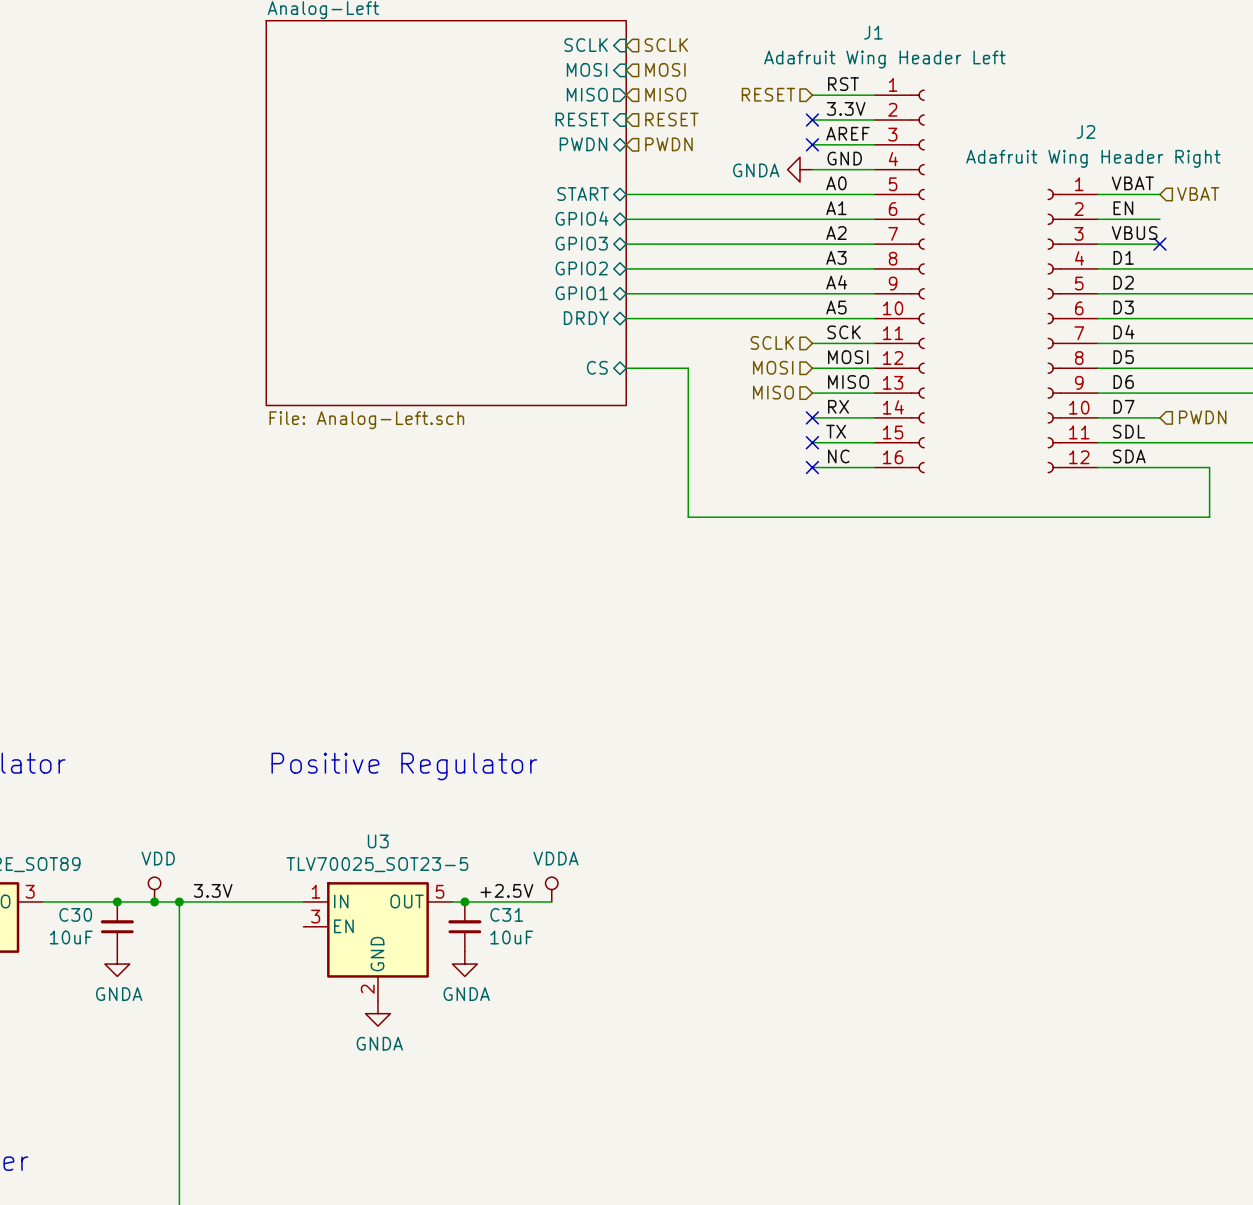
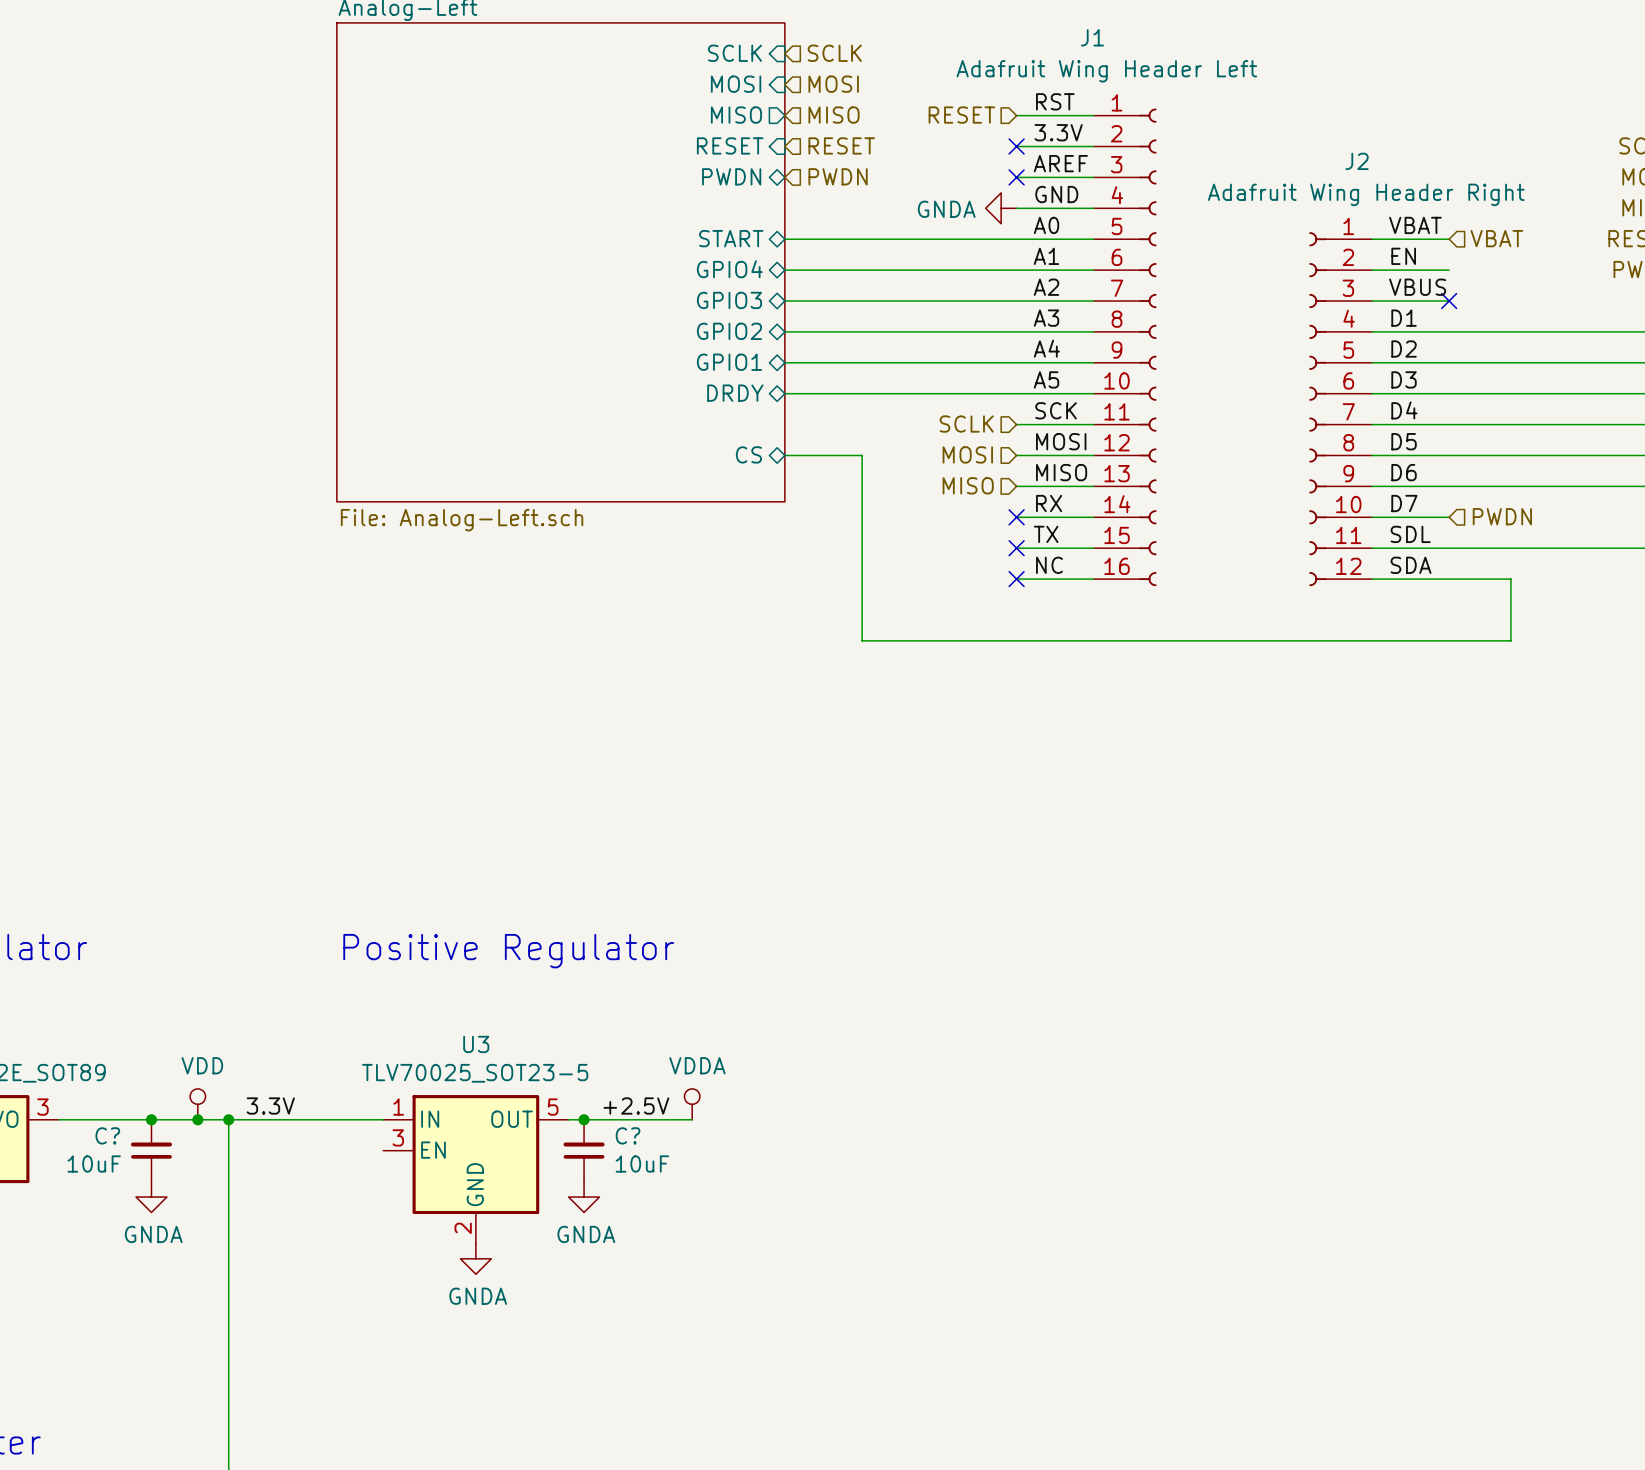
C30 name: C30 (75, 914) -> C? (107, 1135)
C31 name: C31 (506, 914) -> C? (628, 1135)

